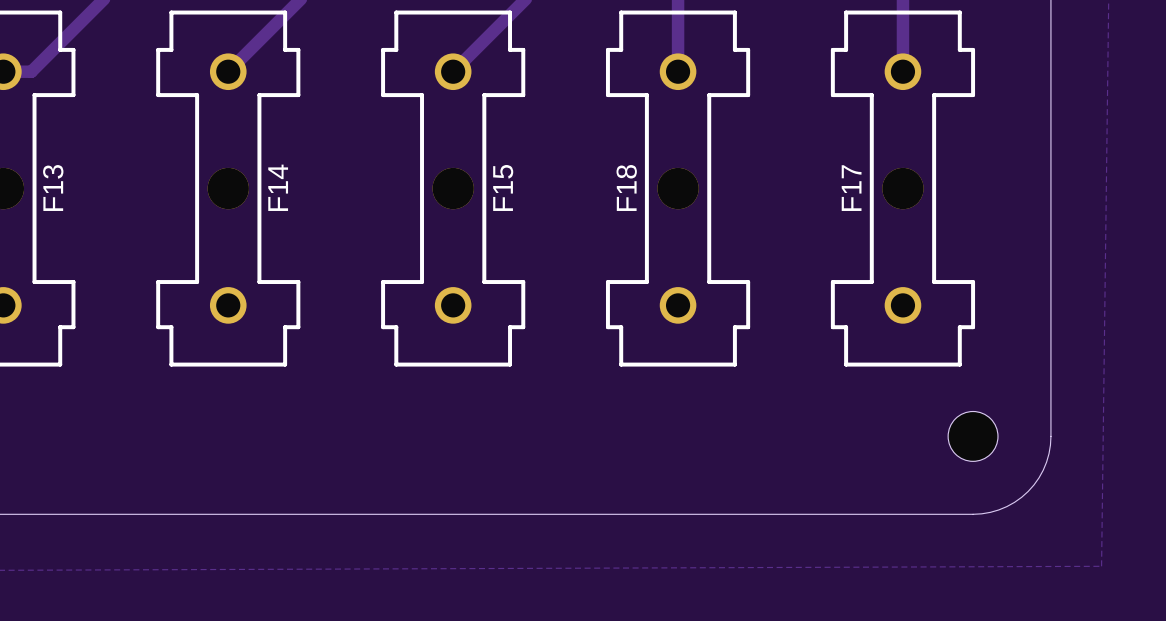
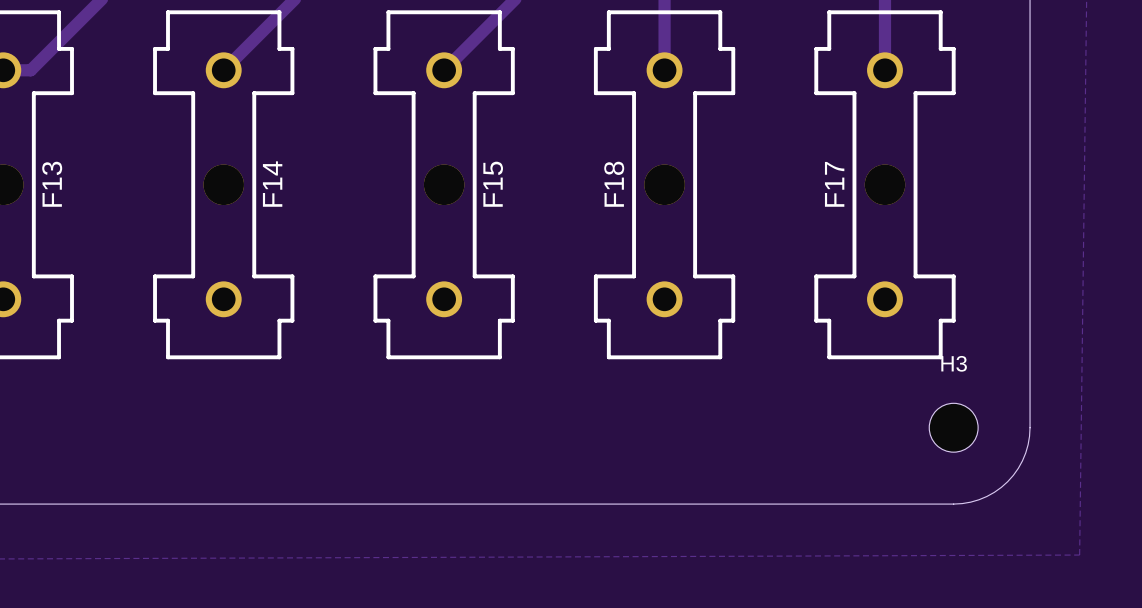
H3 name: none -> H3 (954, 363)

